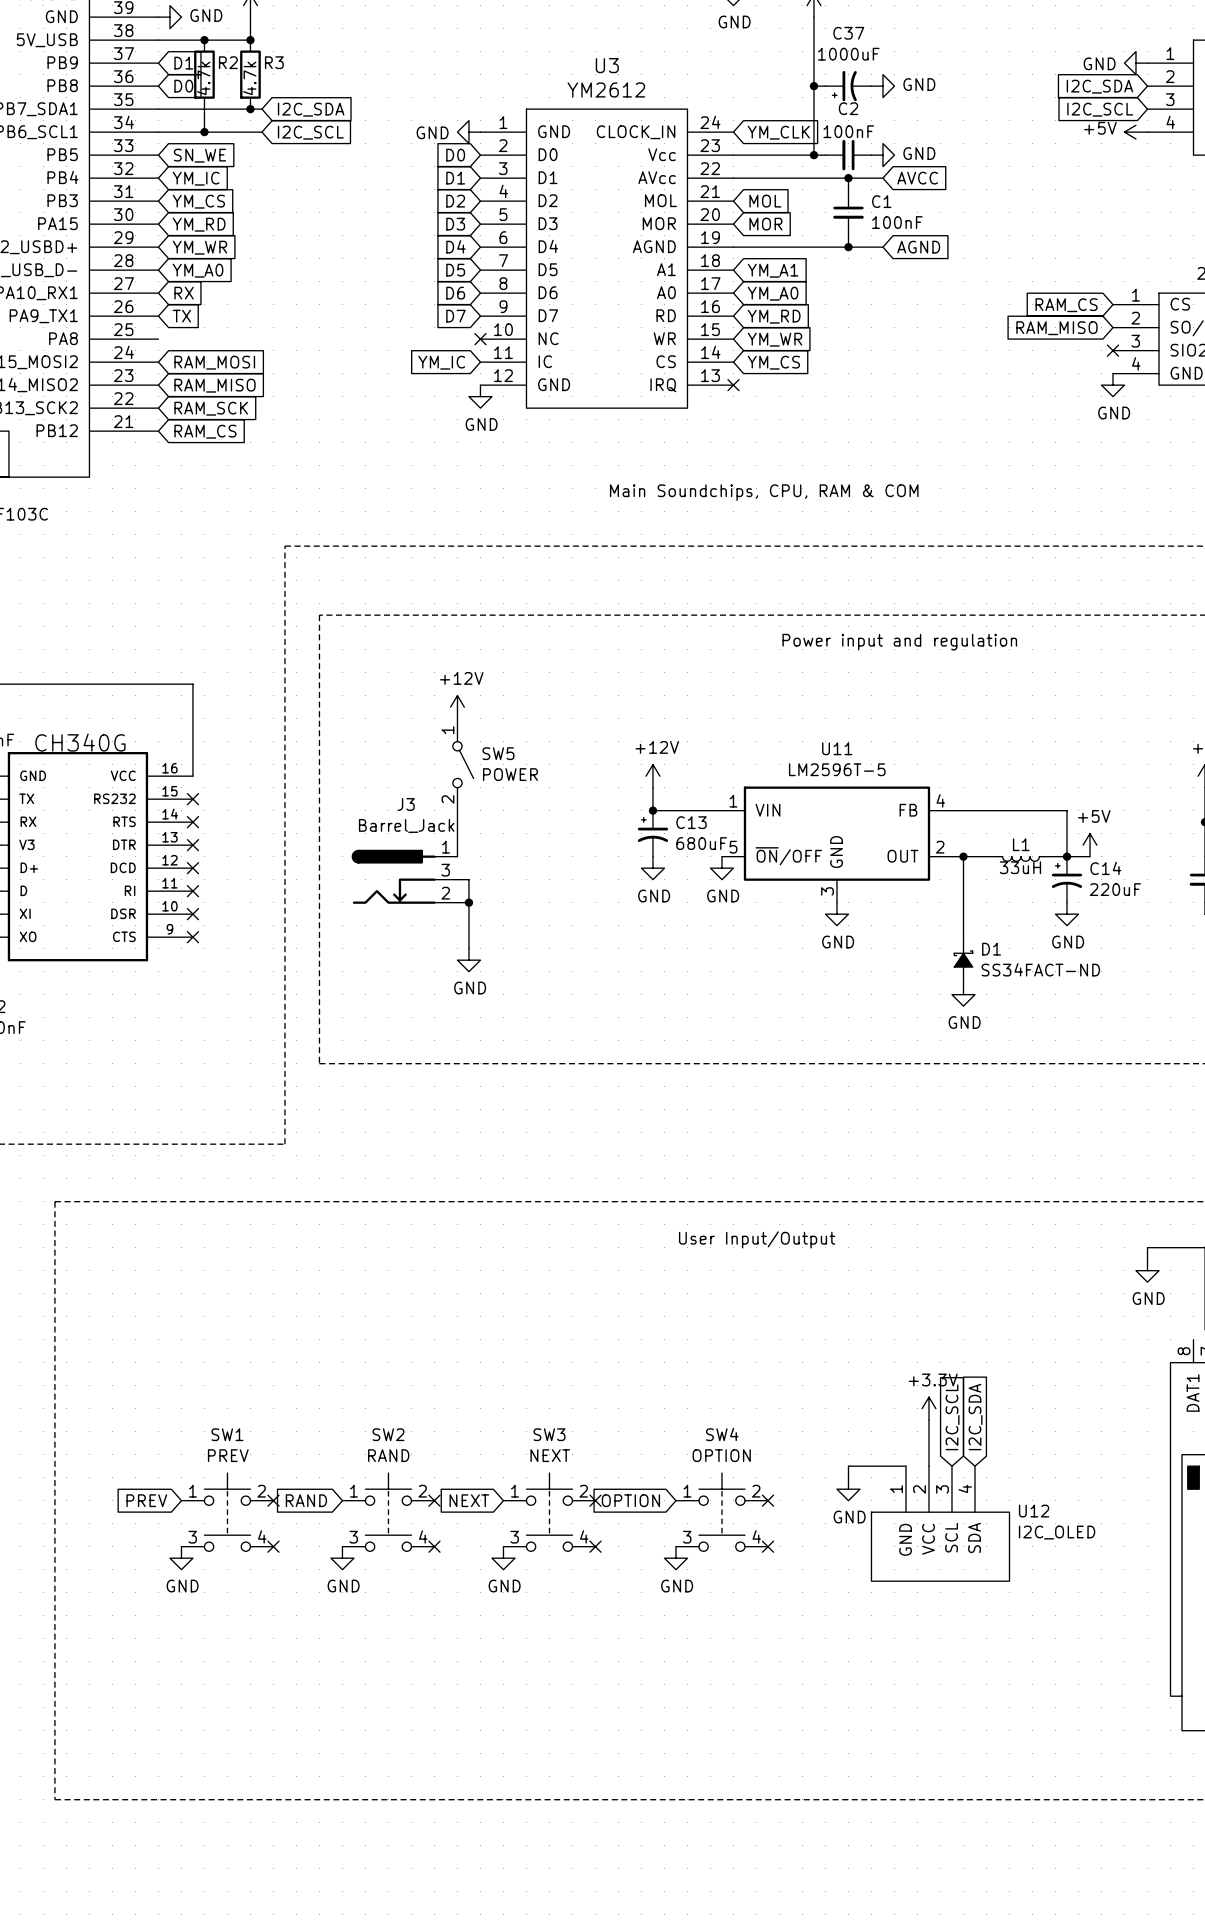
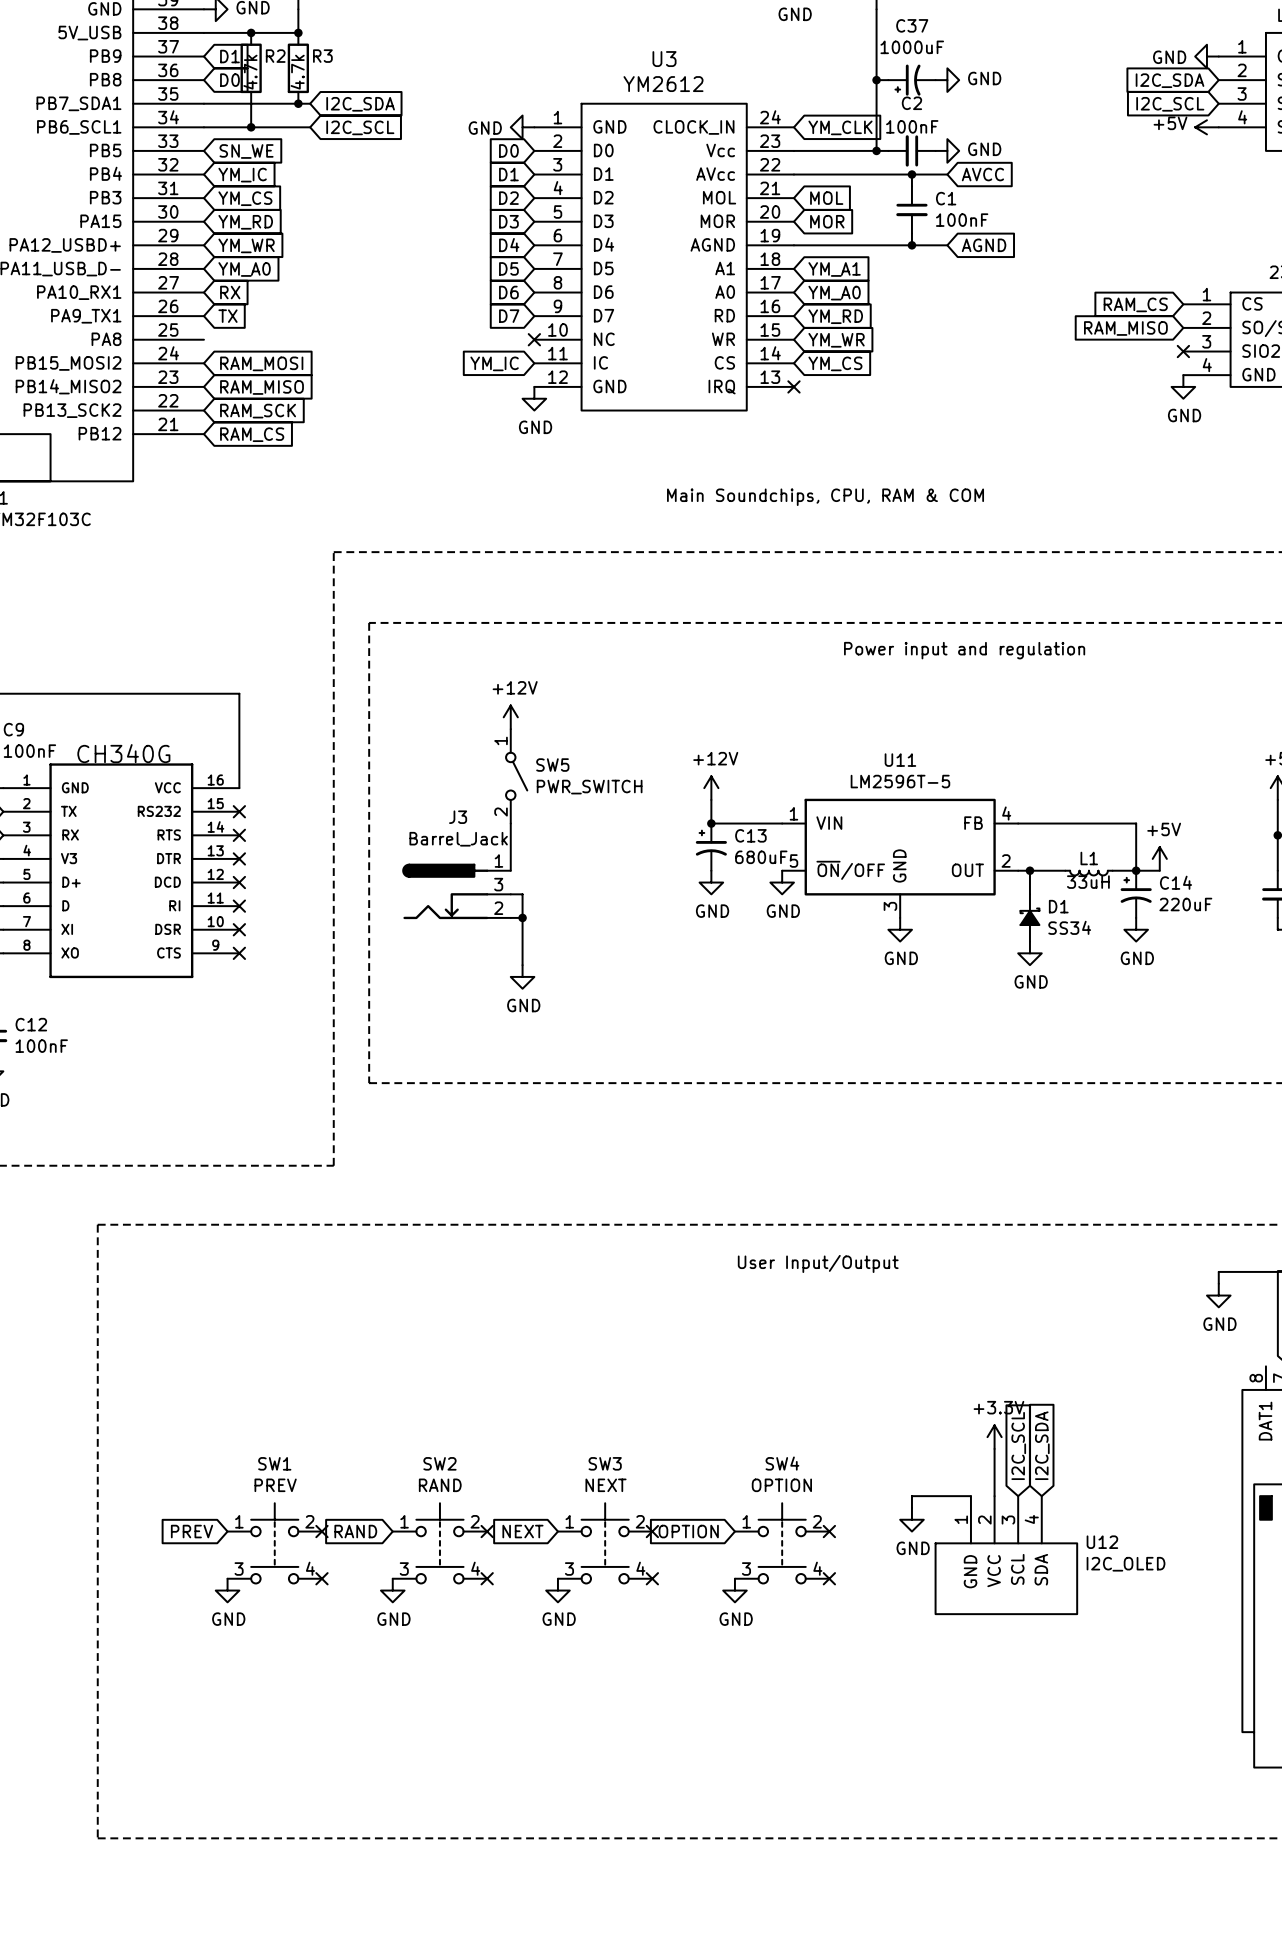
SW5 value: POWER (510, 774) -> PWR_SWITCH (589, 787)
D1 position: (963, 960) -> (1029, 917)
D1 value: SS34FACT-ND (1040, 969) -> SS34 (1069, 927)
power symbol position: GND (963, 994) -> GND (1029, 953)

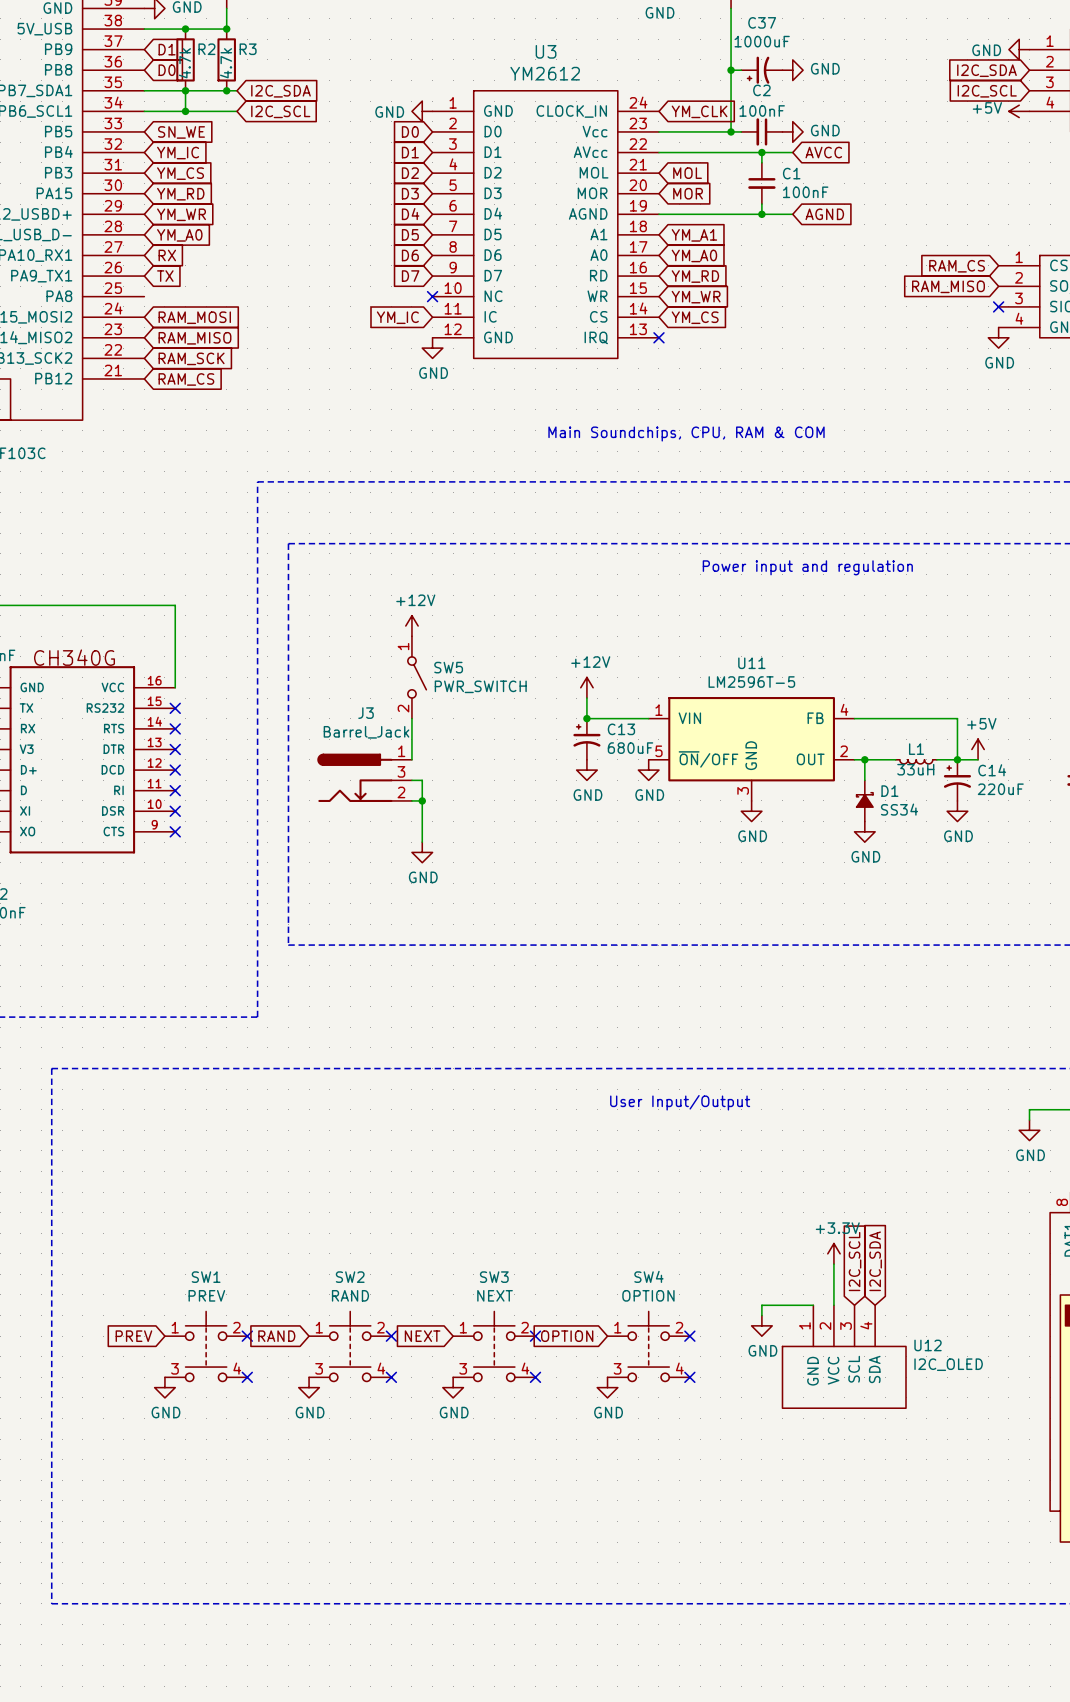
junction: none -> (185, 90)

